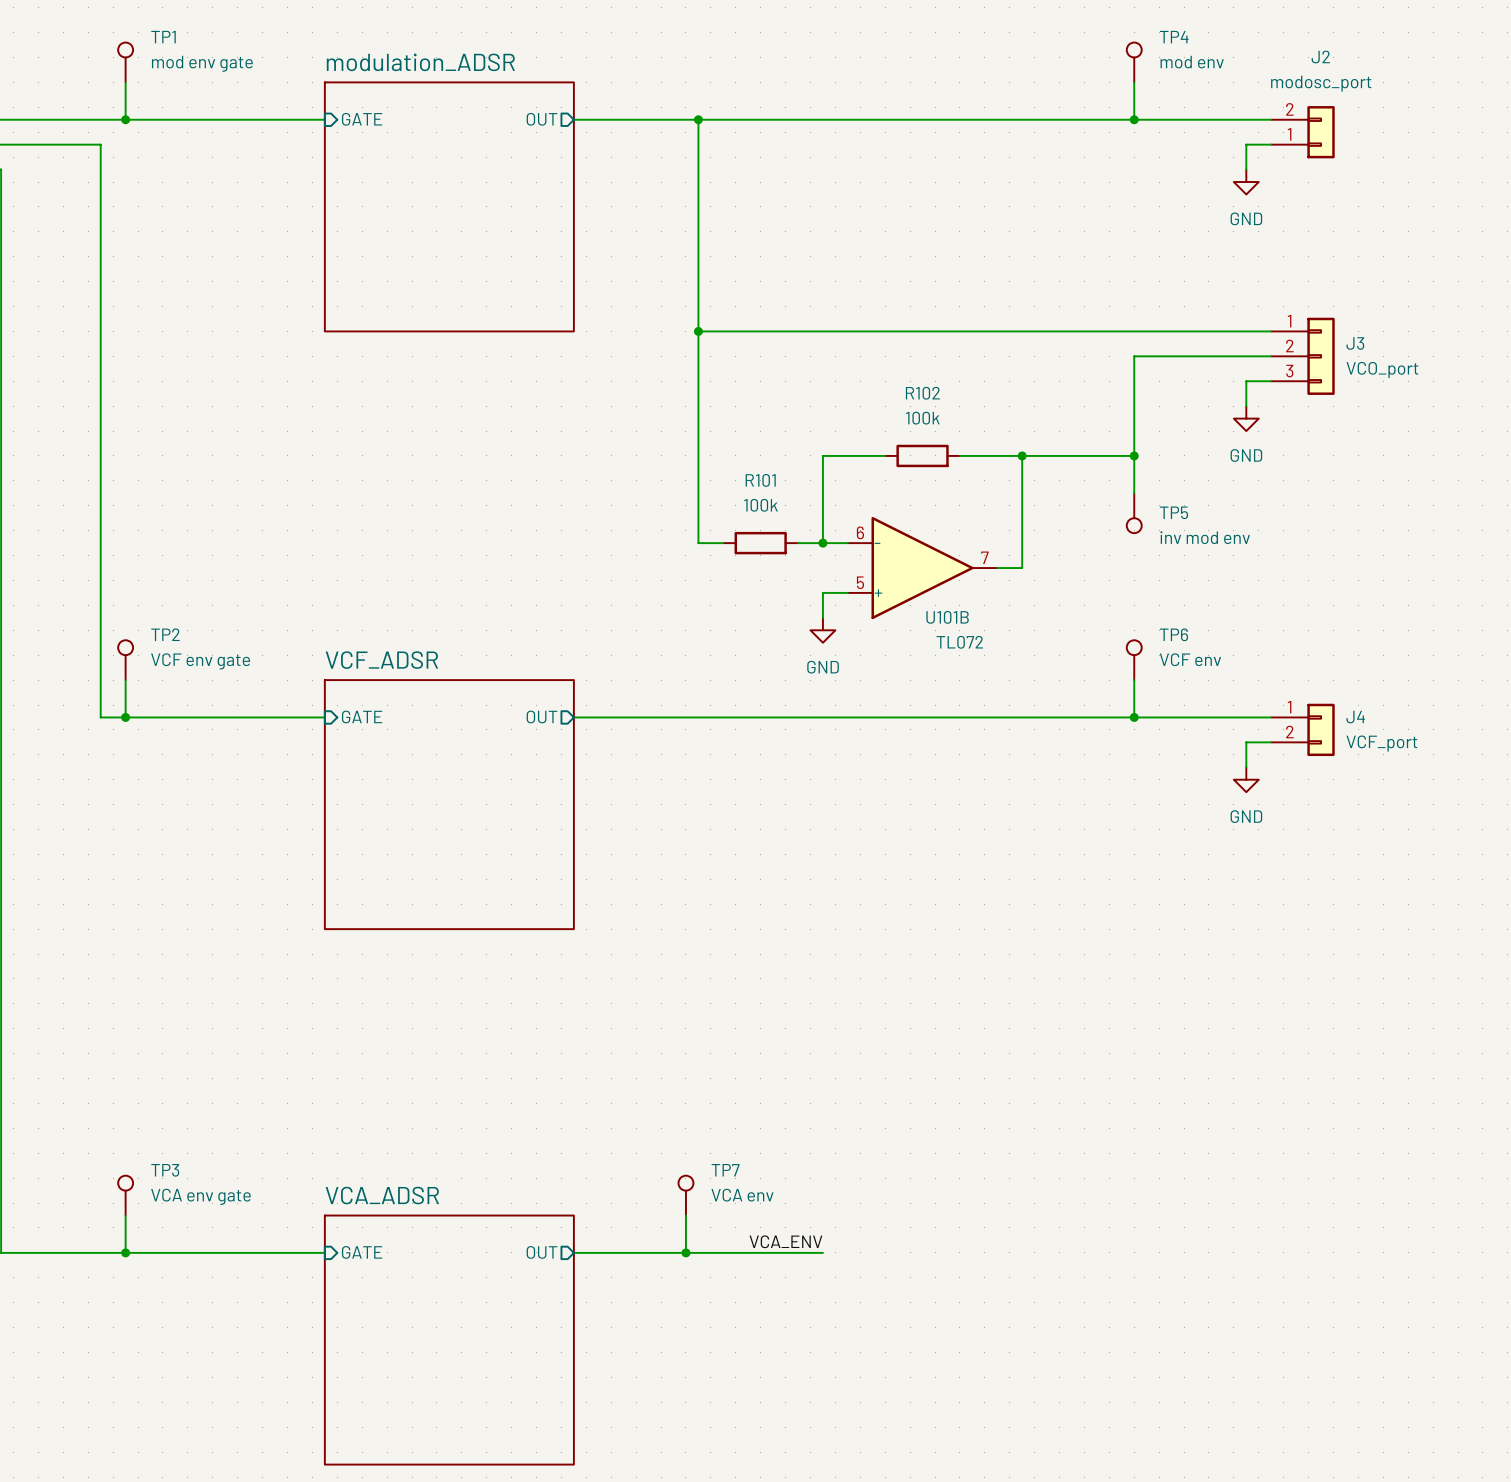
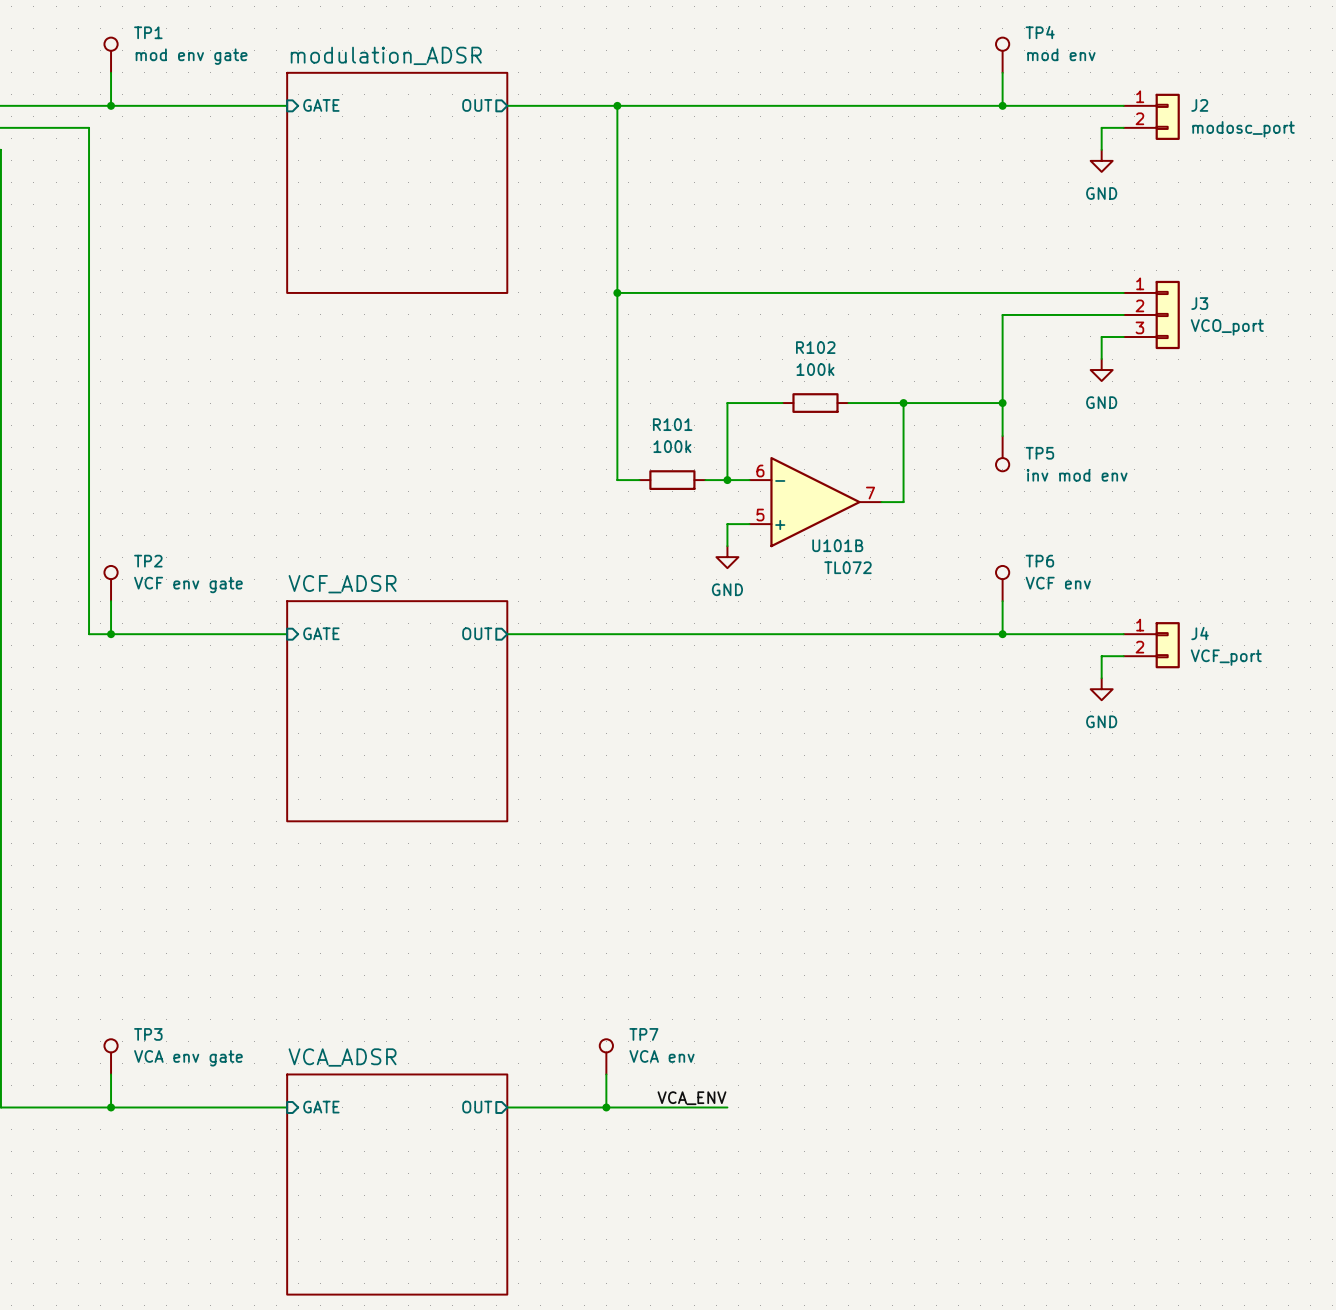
J2 name position: J2 (1320, 57) -> J2 (1199, 105)
J2 value position: modosc_port (1321, 83) -> modosc_port (1243, 129)
J2 flip: as is (1321, 132) -> up-down (1167, 116)

